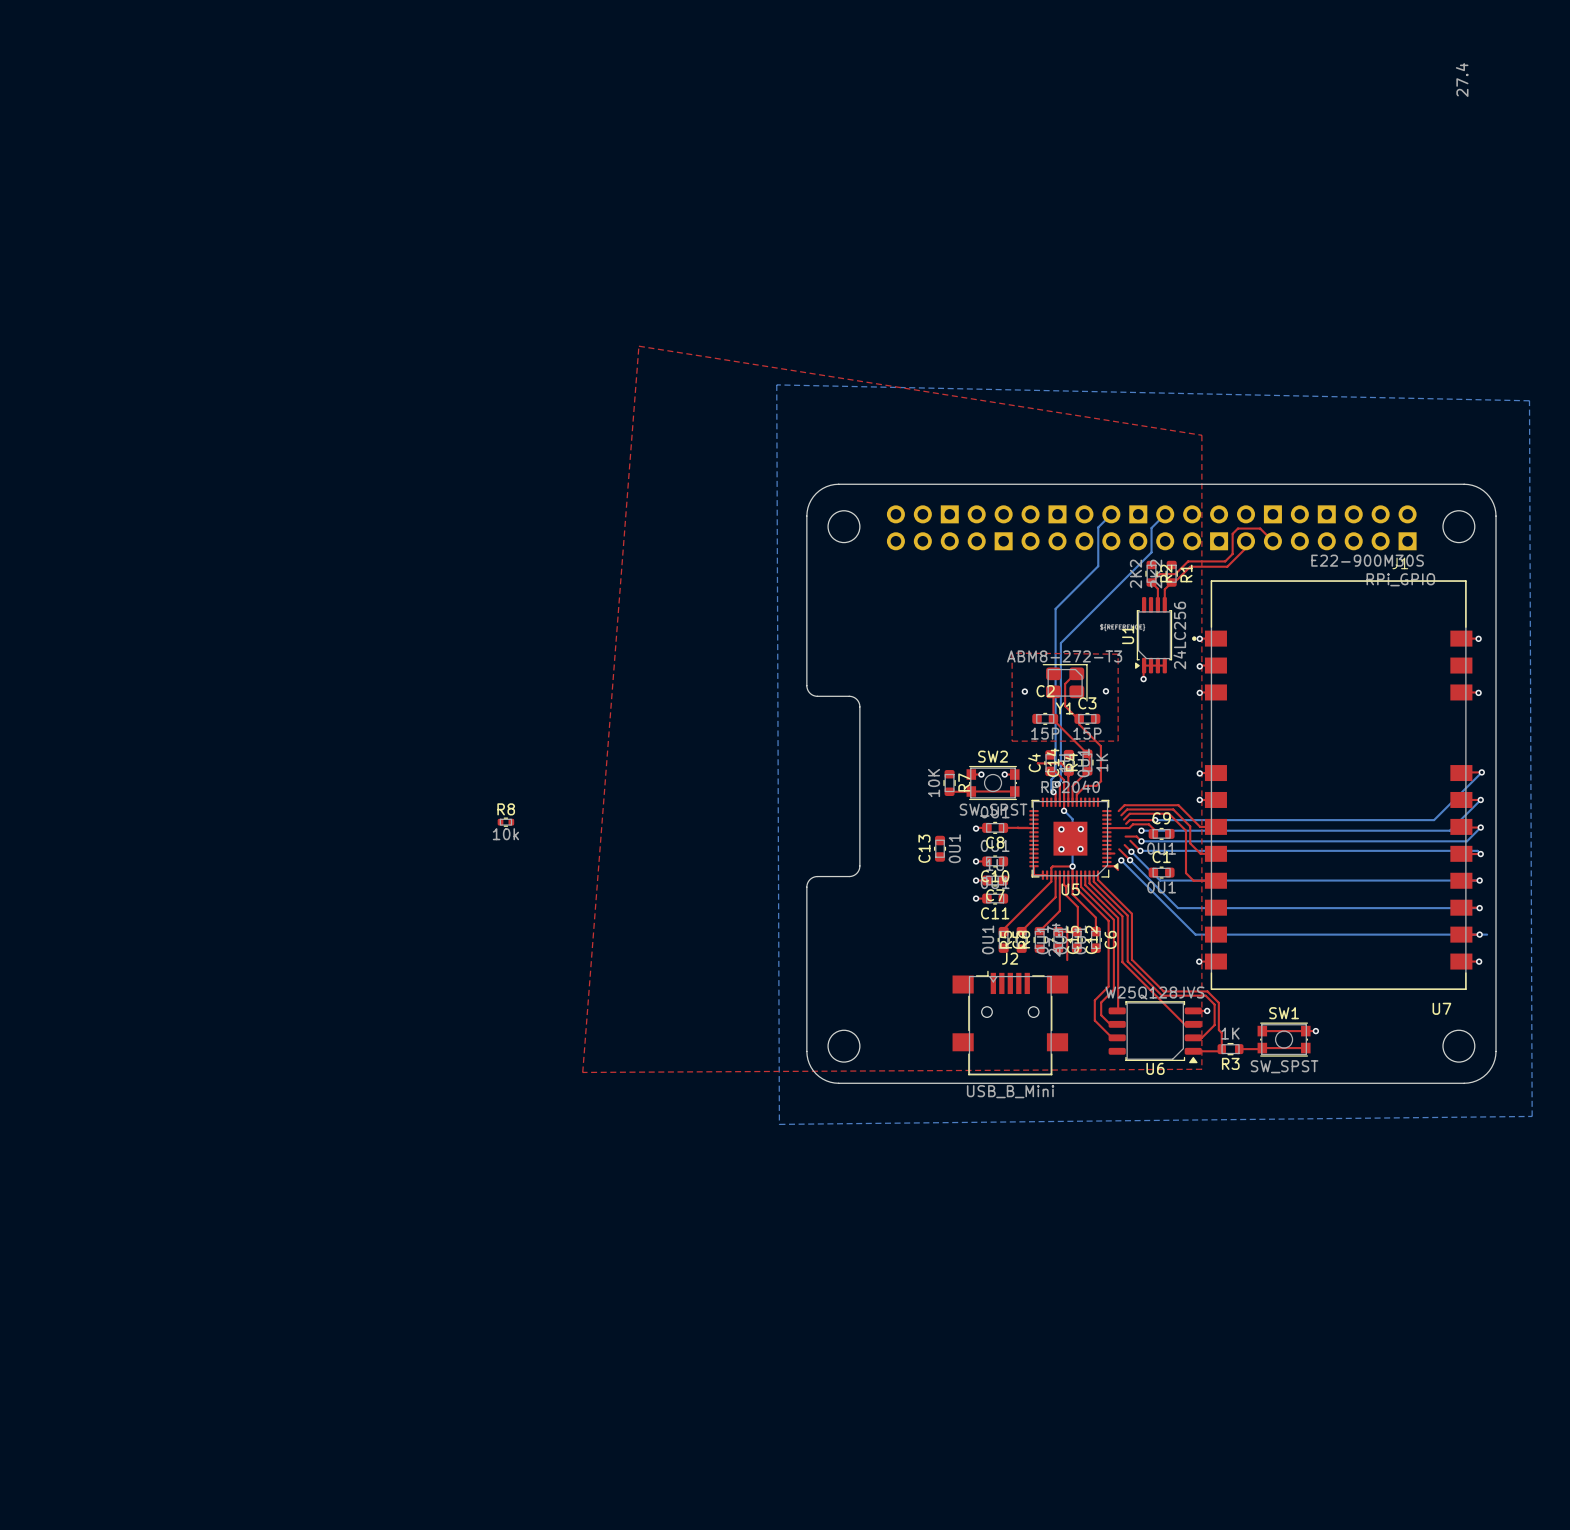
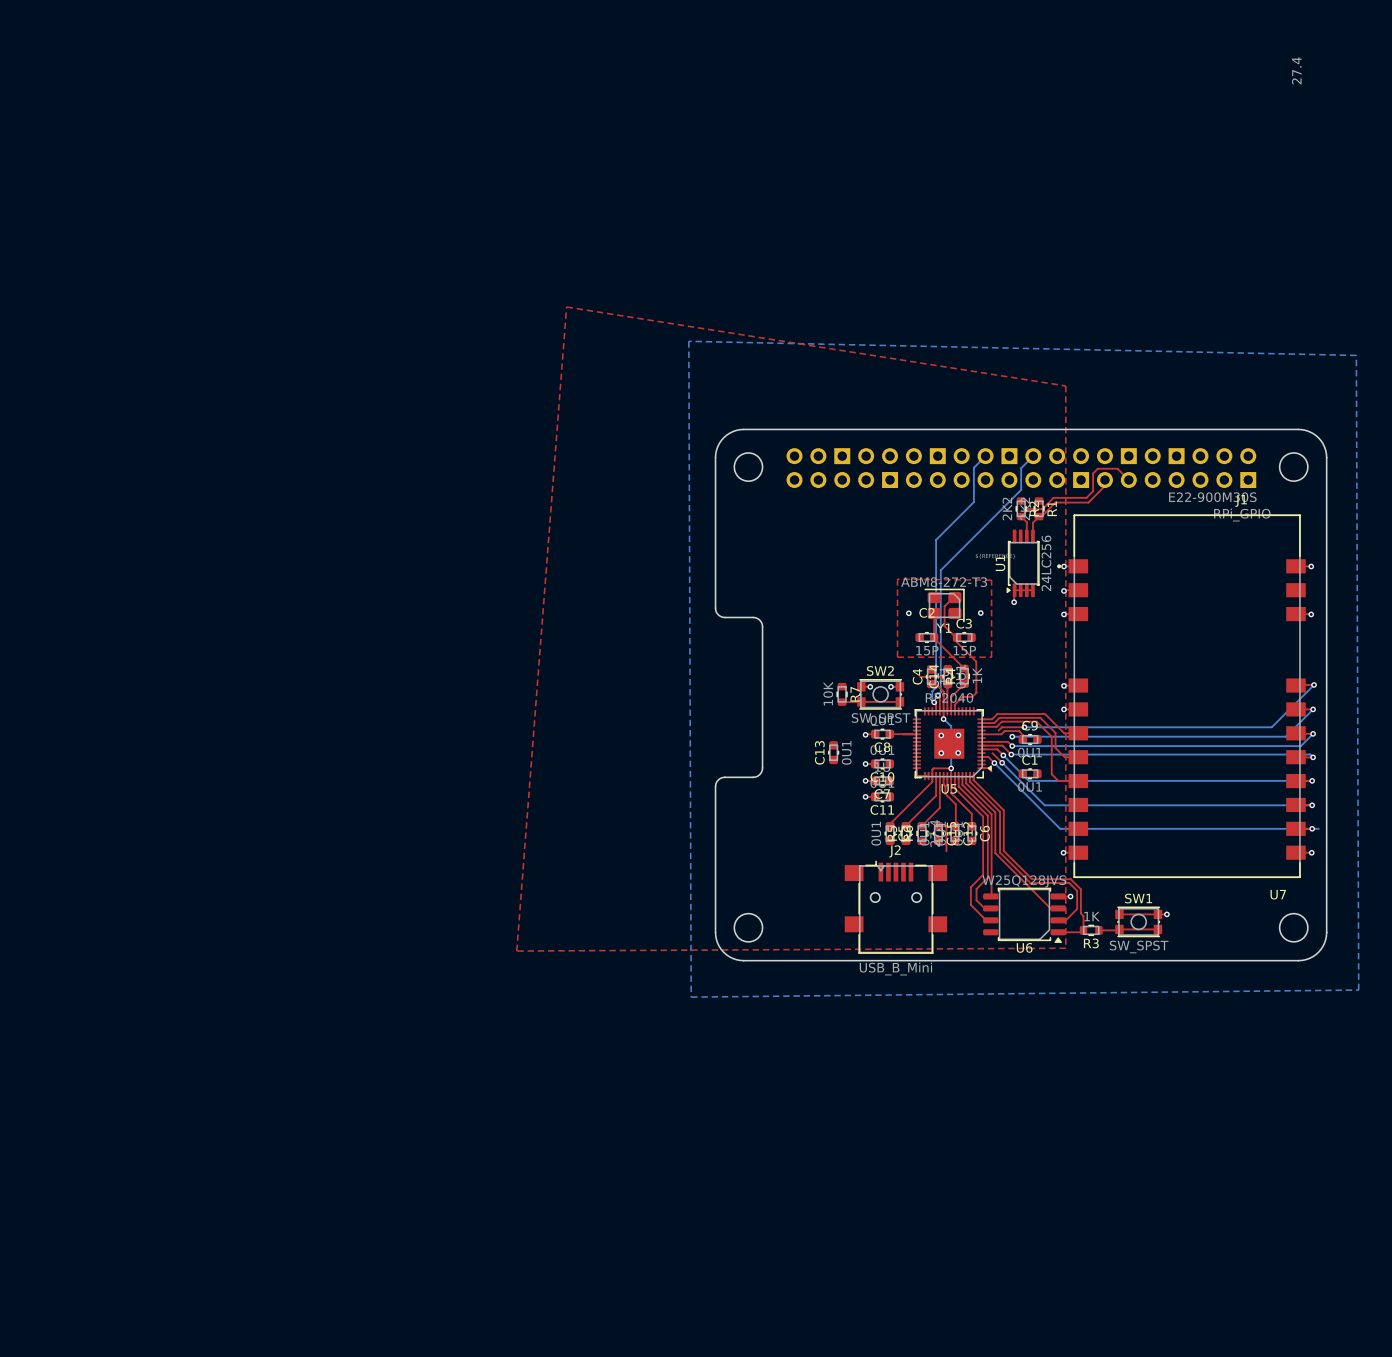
top track: none -> (981, 719) (992, 719)
top track: none -> (981, 723) (994, 723)
top track: none -> (981, 726) (996, 726)
R8: 10k (505, 822) -> none
top track: none -> (981, 741) (998, 741)
top track: none -> (981, 745) (1002, 745)
top track: none -> (981, 749) (997, 749)
top track: none -> (988, 756) (994, 763)

